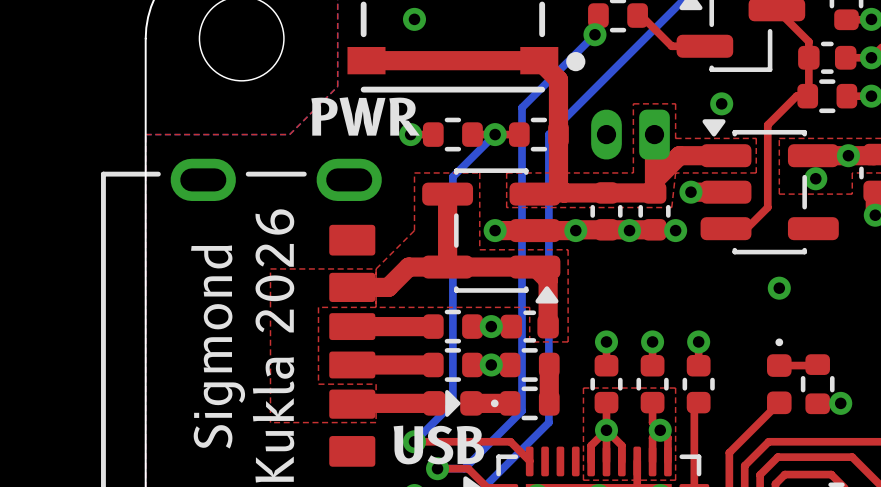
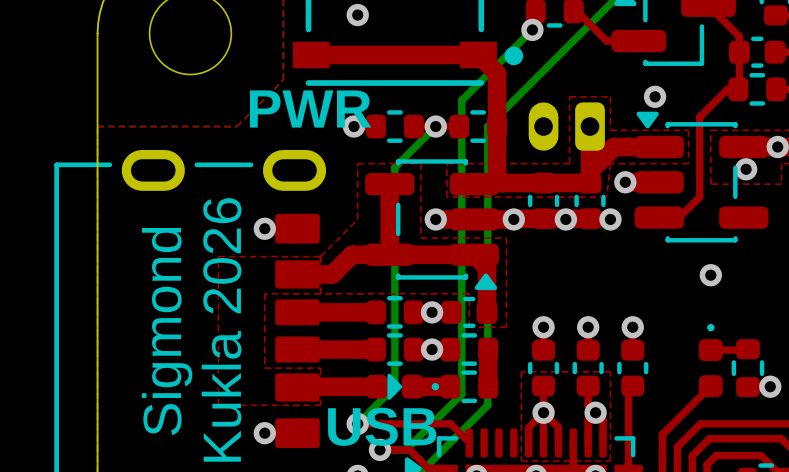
via: none -> (264, 228)
via: none -> (264, 433)

